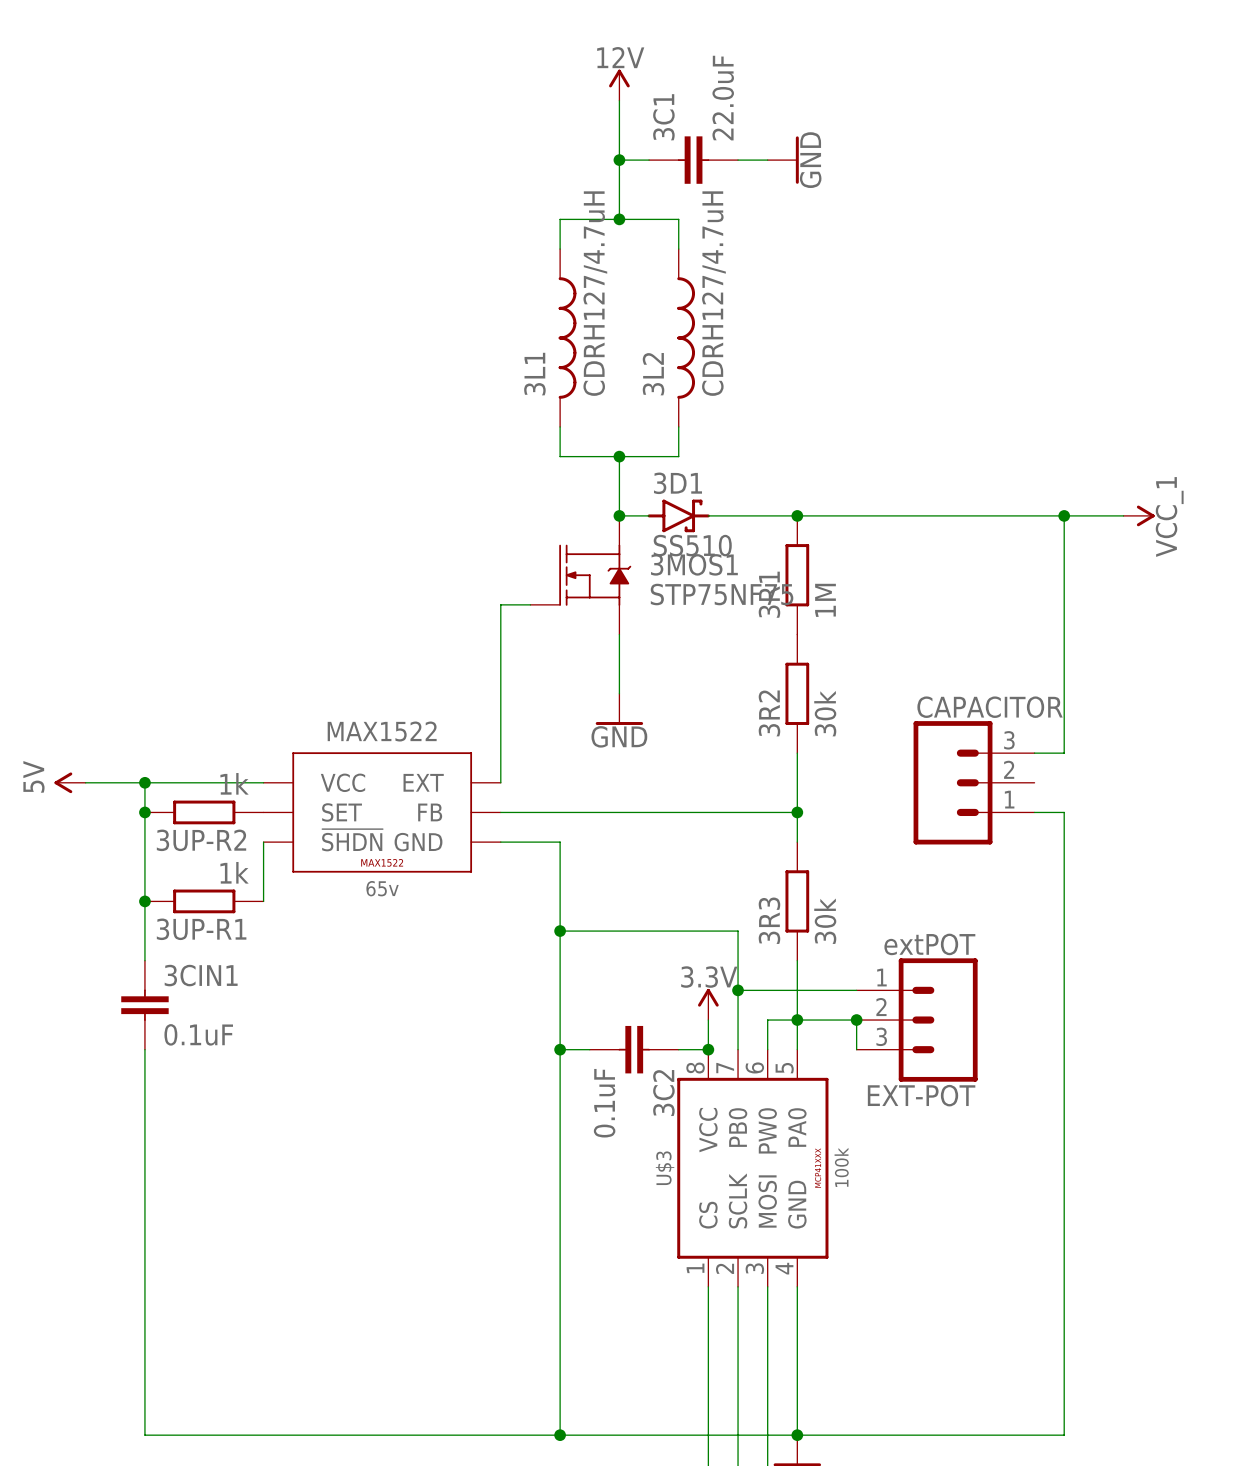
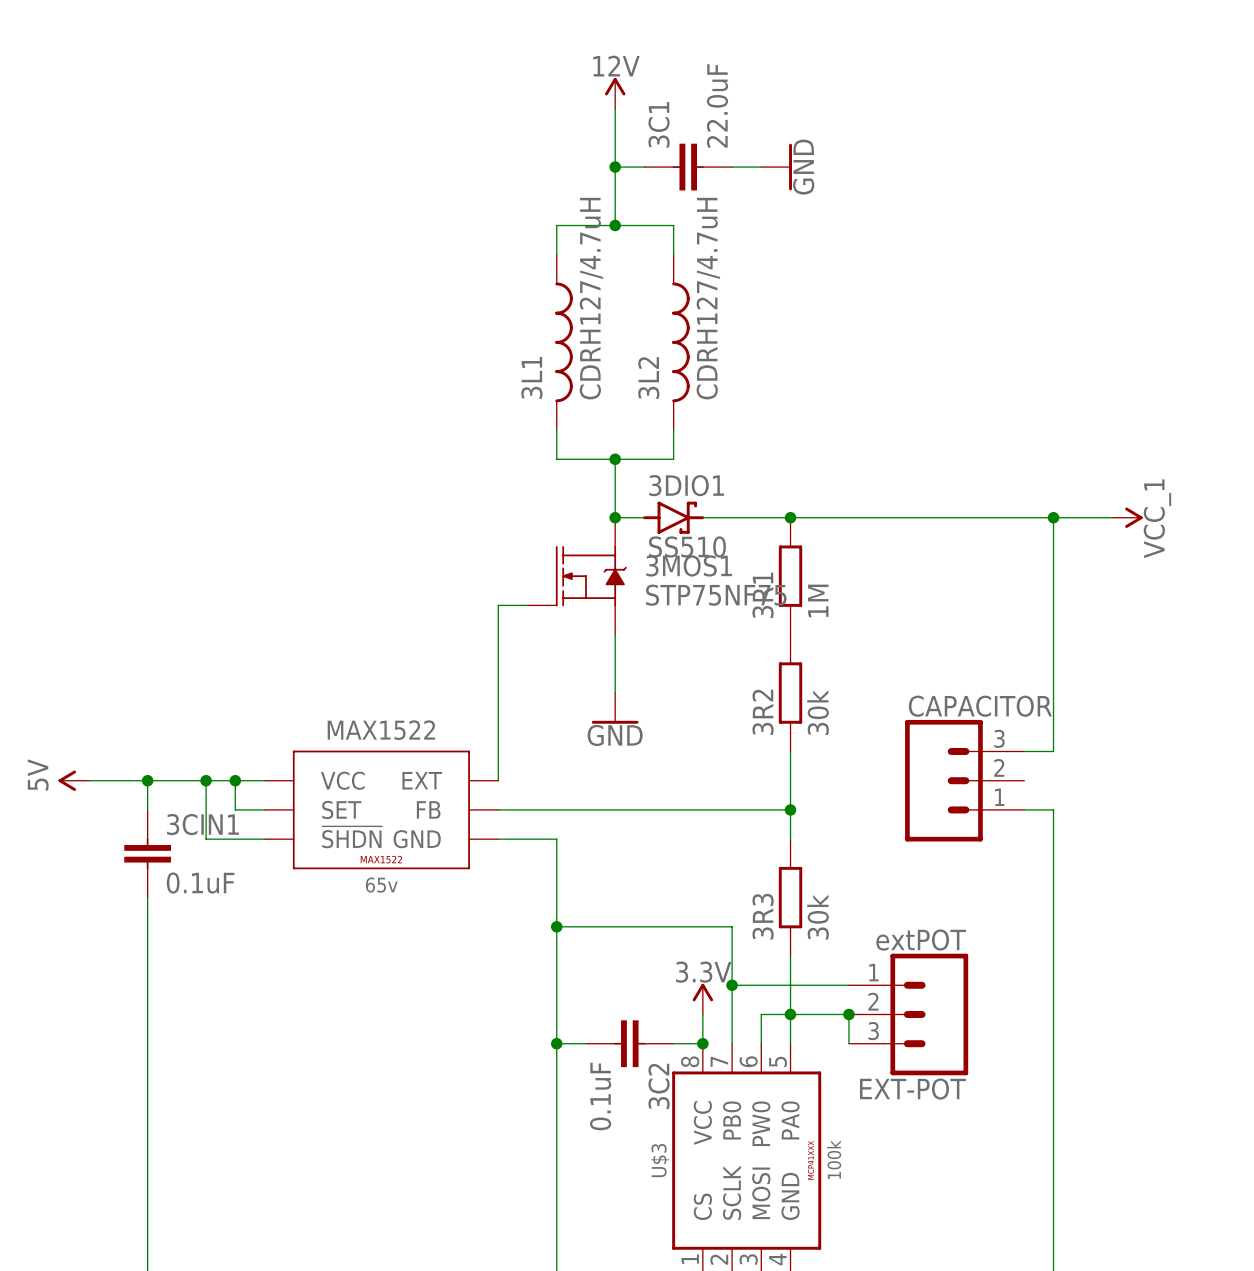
3D1 name: 3D1 (677, 483) -> 3DIO1 (686, 485)
junction: none -> (206, 780)
junction: none -> (235, 780)
junction: (144, 812) -> none
3UP-R2: 1k (204, 812) -> none
wire: (263, 842) (263, 901) -> (264, 839) (206, 839) (206, 780)
junction: (144, 901) -> none
3UP-R1: 1k (204, 901) -> none
3CIN1 position: (144, 1005) -> (147, 853)

